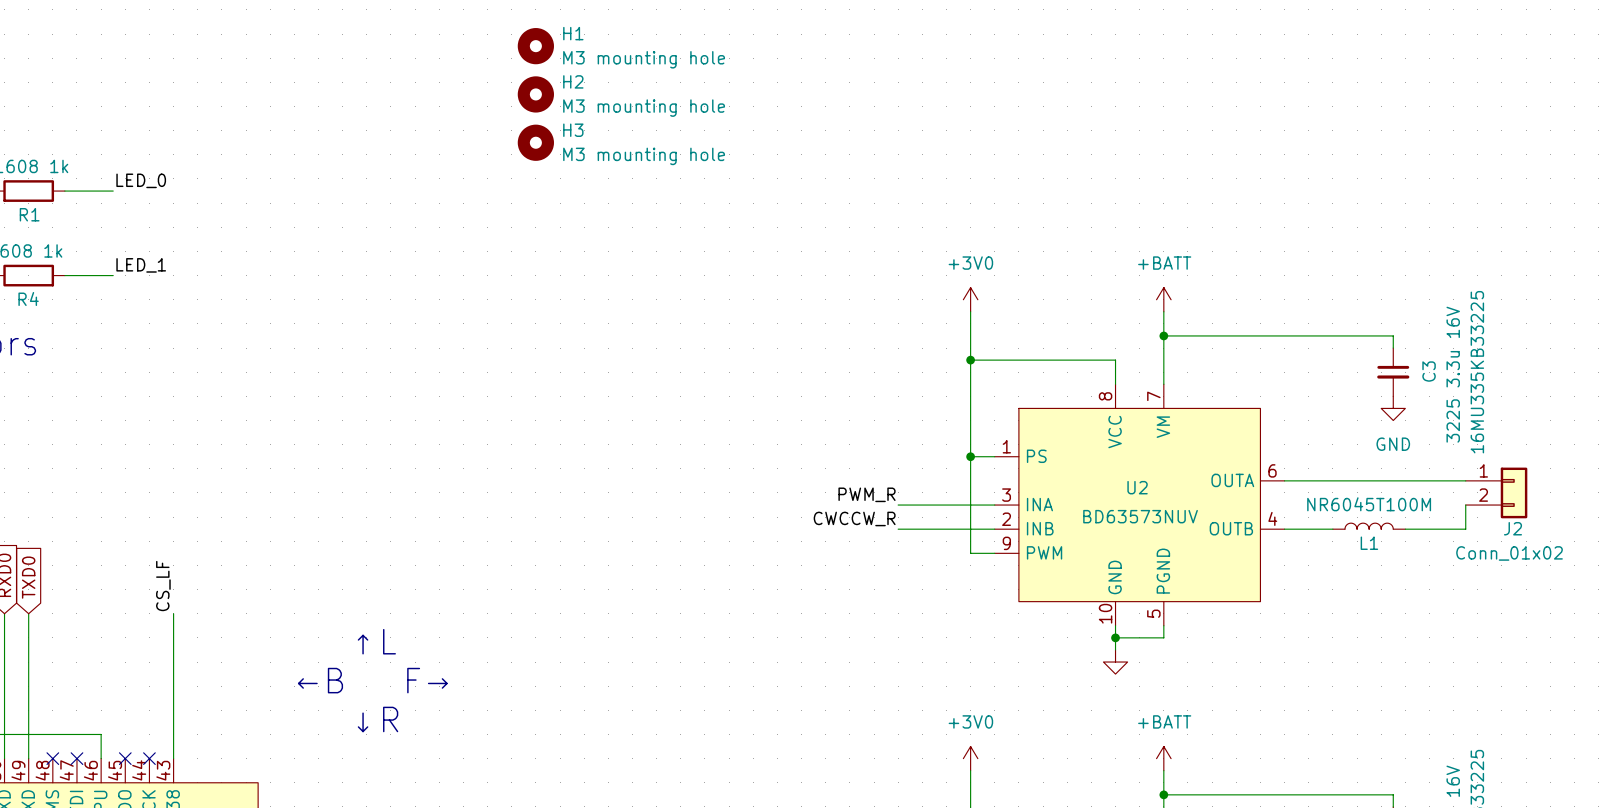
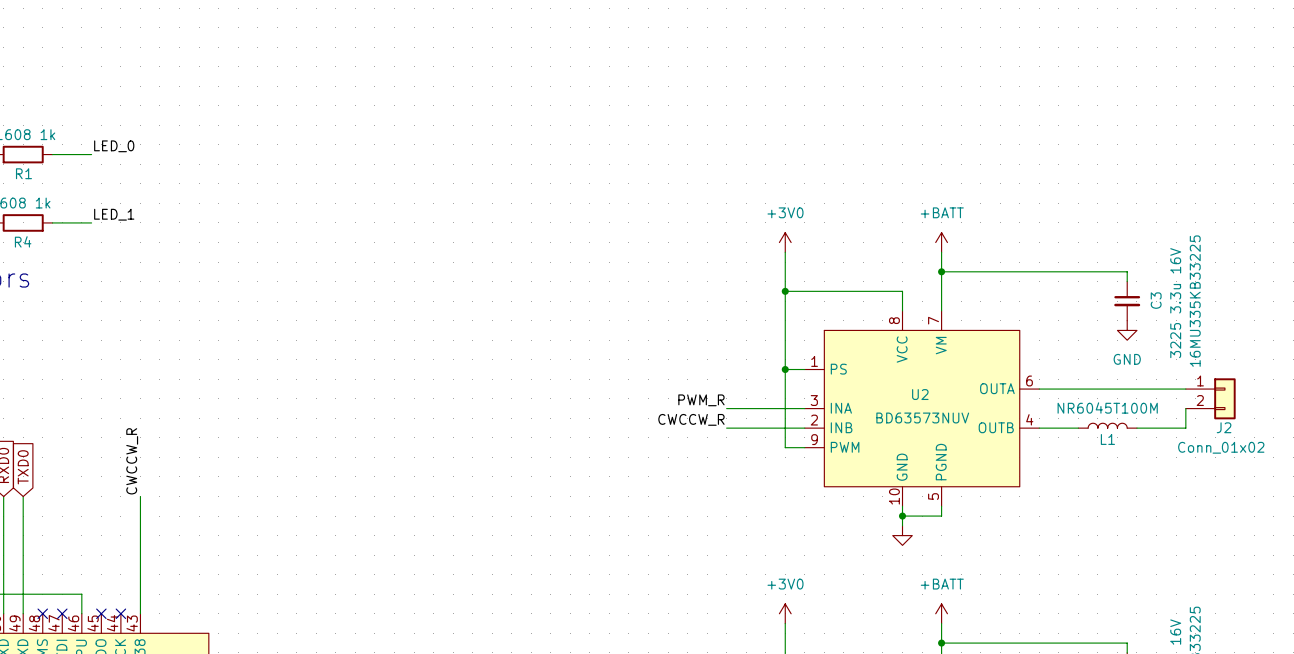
H1: M3 mounting hole (535, 46) -> none
H2: M3 mounting hole (535, 94) -> none
H3: M3 mounting hole (535, 142) -> none
label: CS_LF (163, 586) -> CWCCW_R (132, 461)
text: ↑L (376, 641) -> none
text: ←B F→ (372, 680) -> none
text: ↓R (377, 719) -> none

